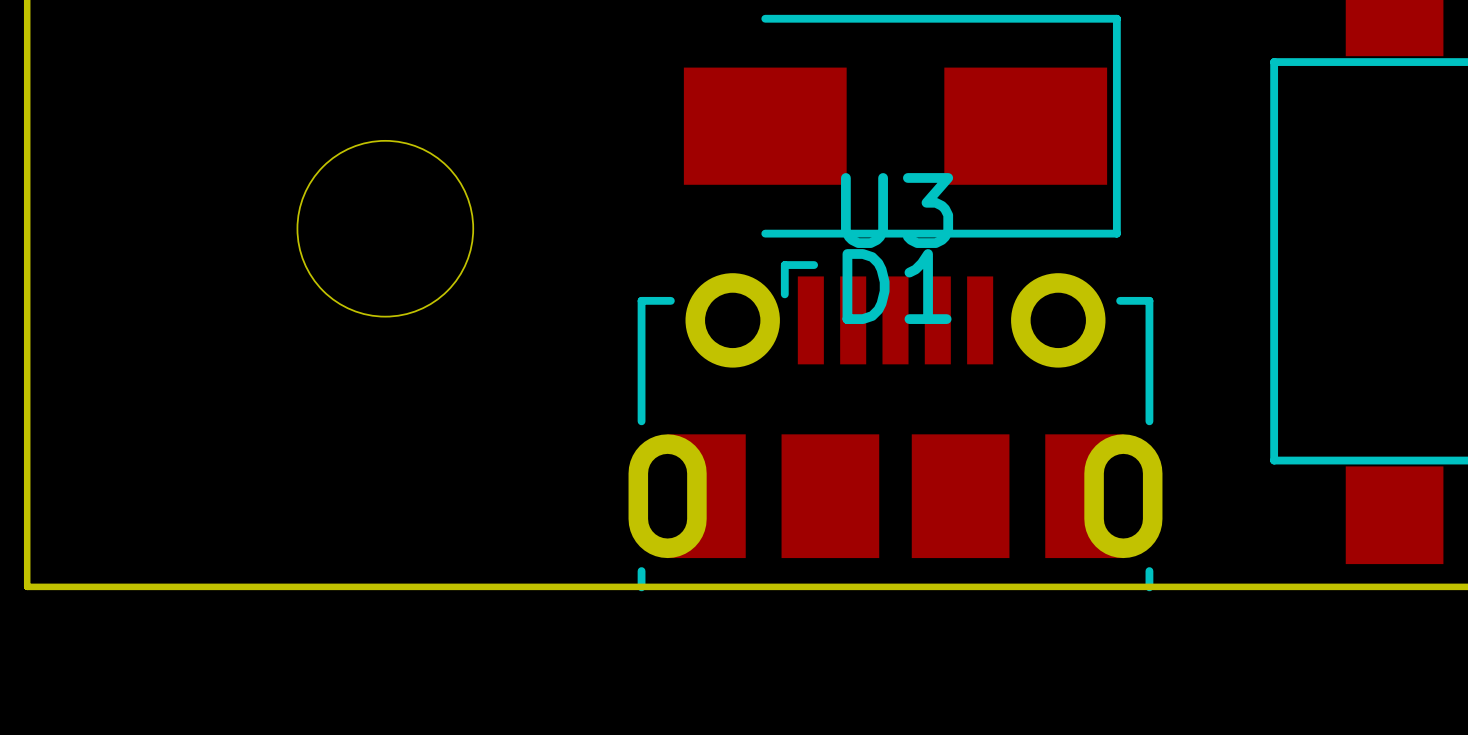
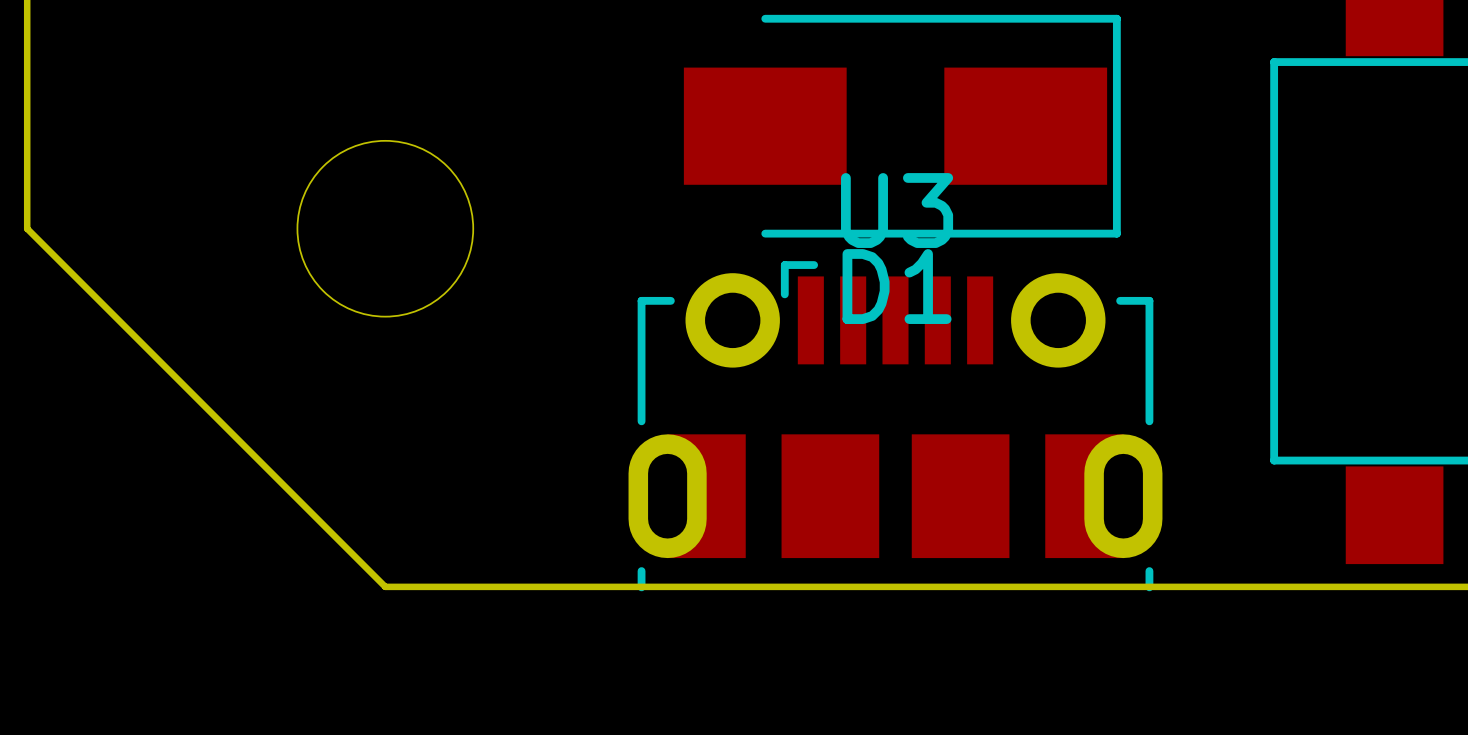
board edge: (27, 228) (27, 586) (385, 586) -> (27, 228) (385, 586)

